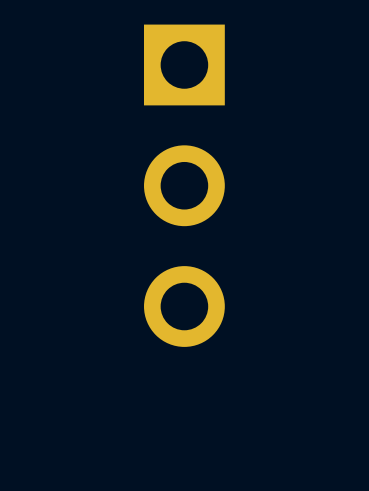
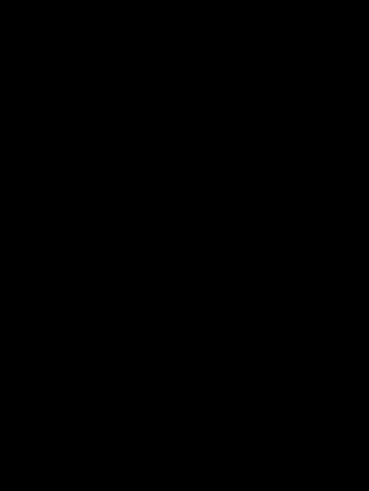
part: (184, 185) -> none

